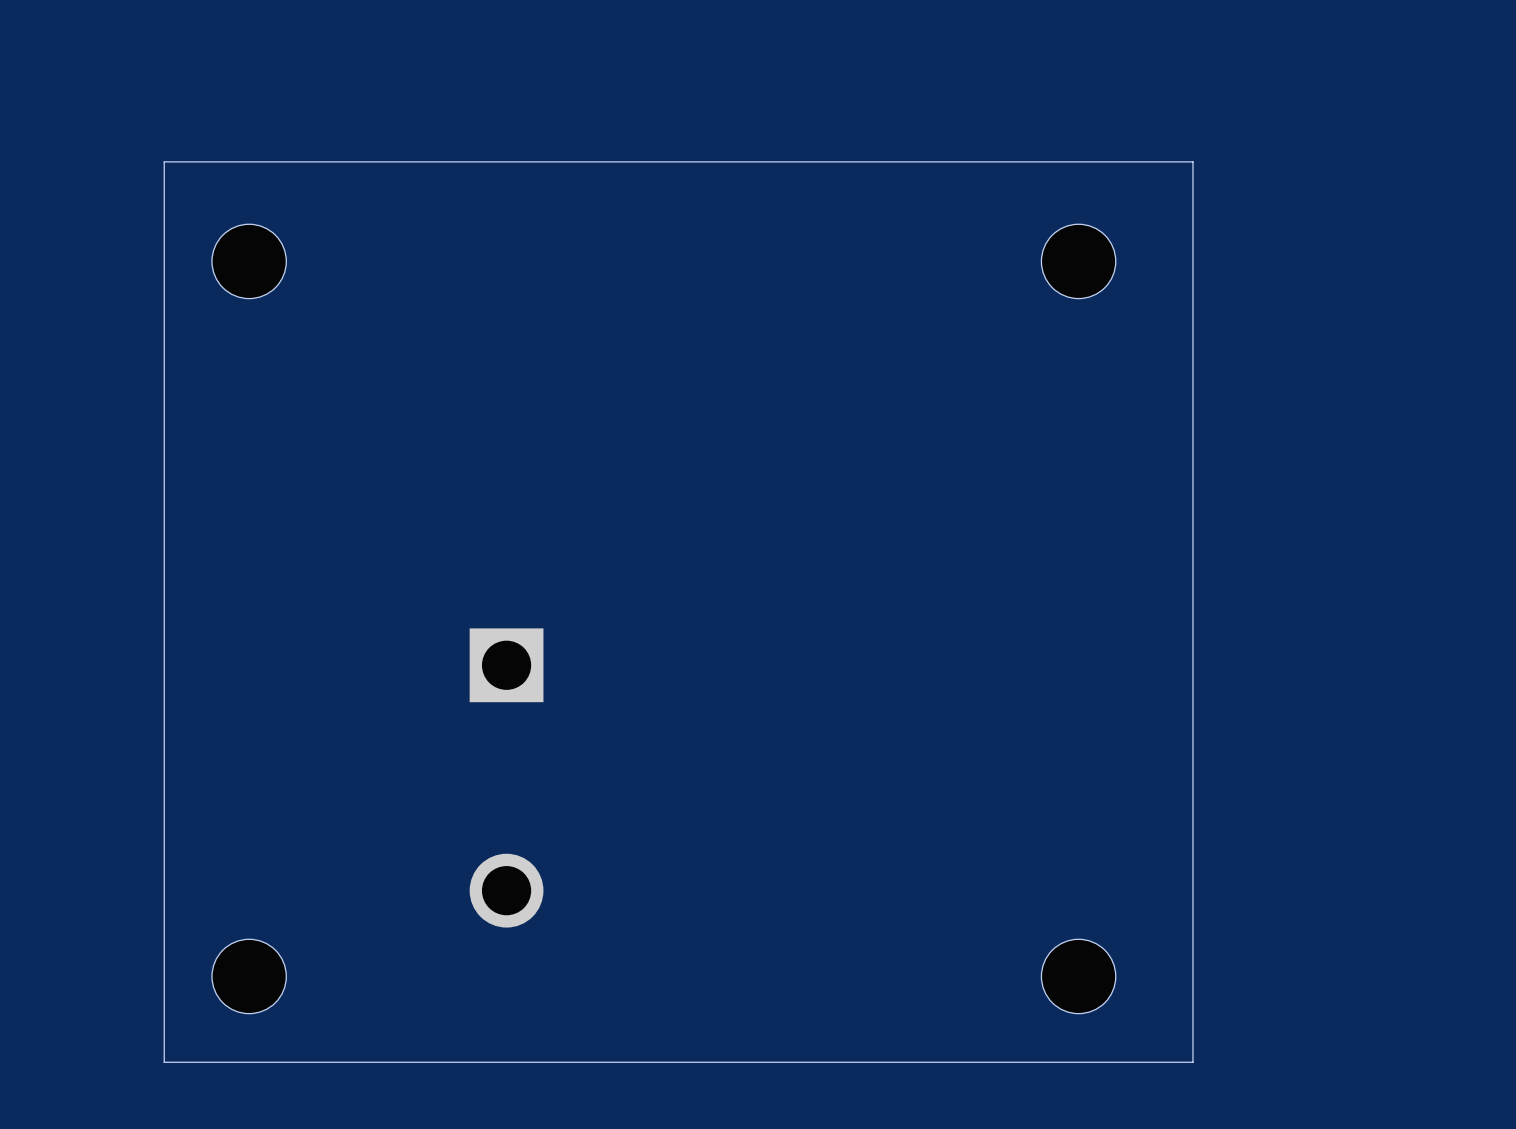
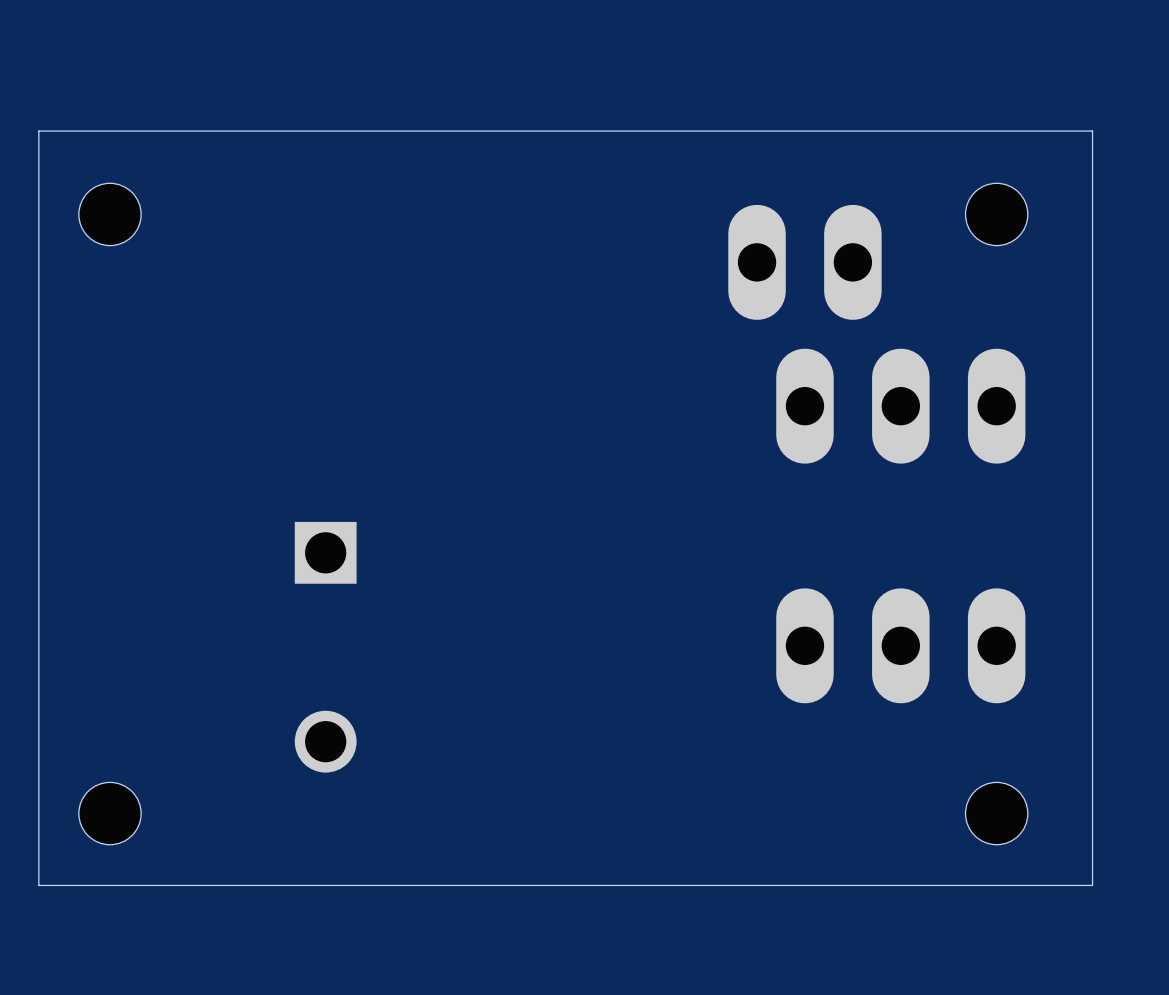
board edge: (1192, 161) (1192, 1062) -> (900, 131) (1092, 131) (1092, 885) (900, 885)
hole position: (1078, 261) -> (996, 214)
part: none -> (804, 262)
part: none -> (900, 406)
part: none -> (900, 645)
hole position: (1078, 976) -> (996, 813)

